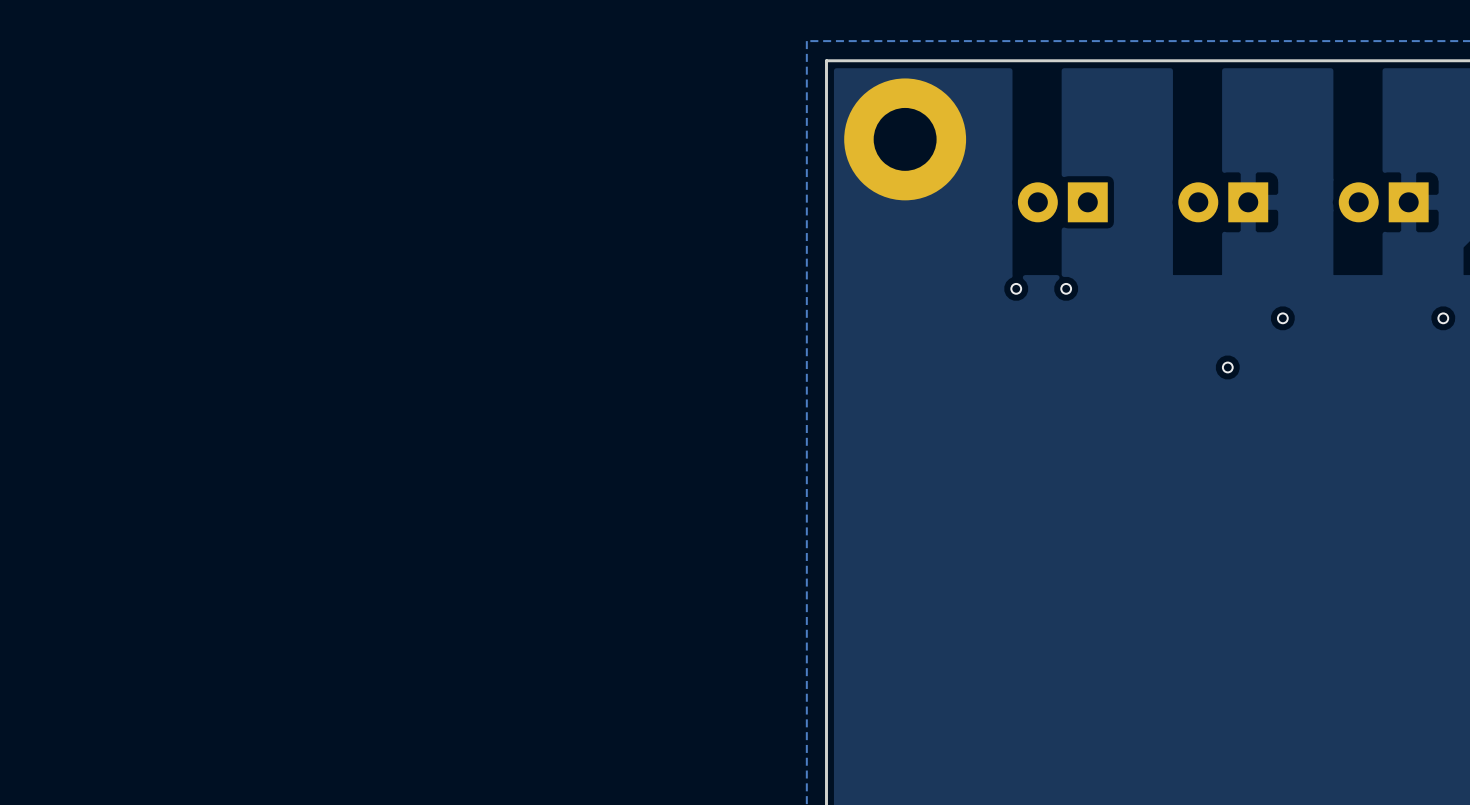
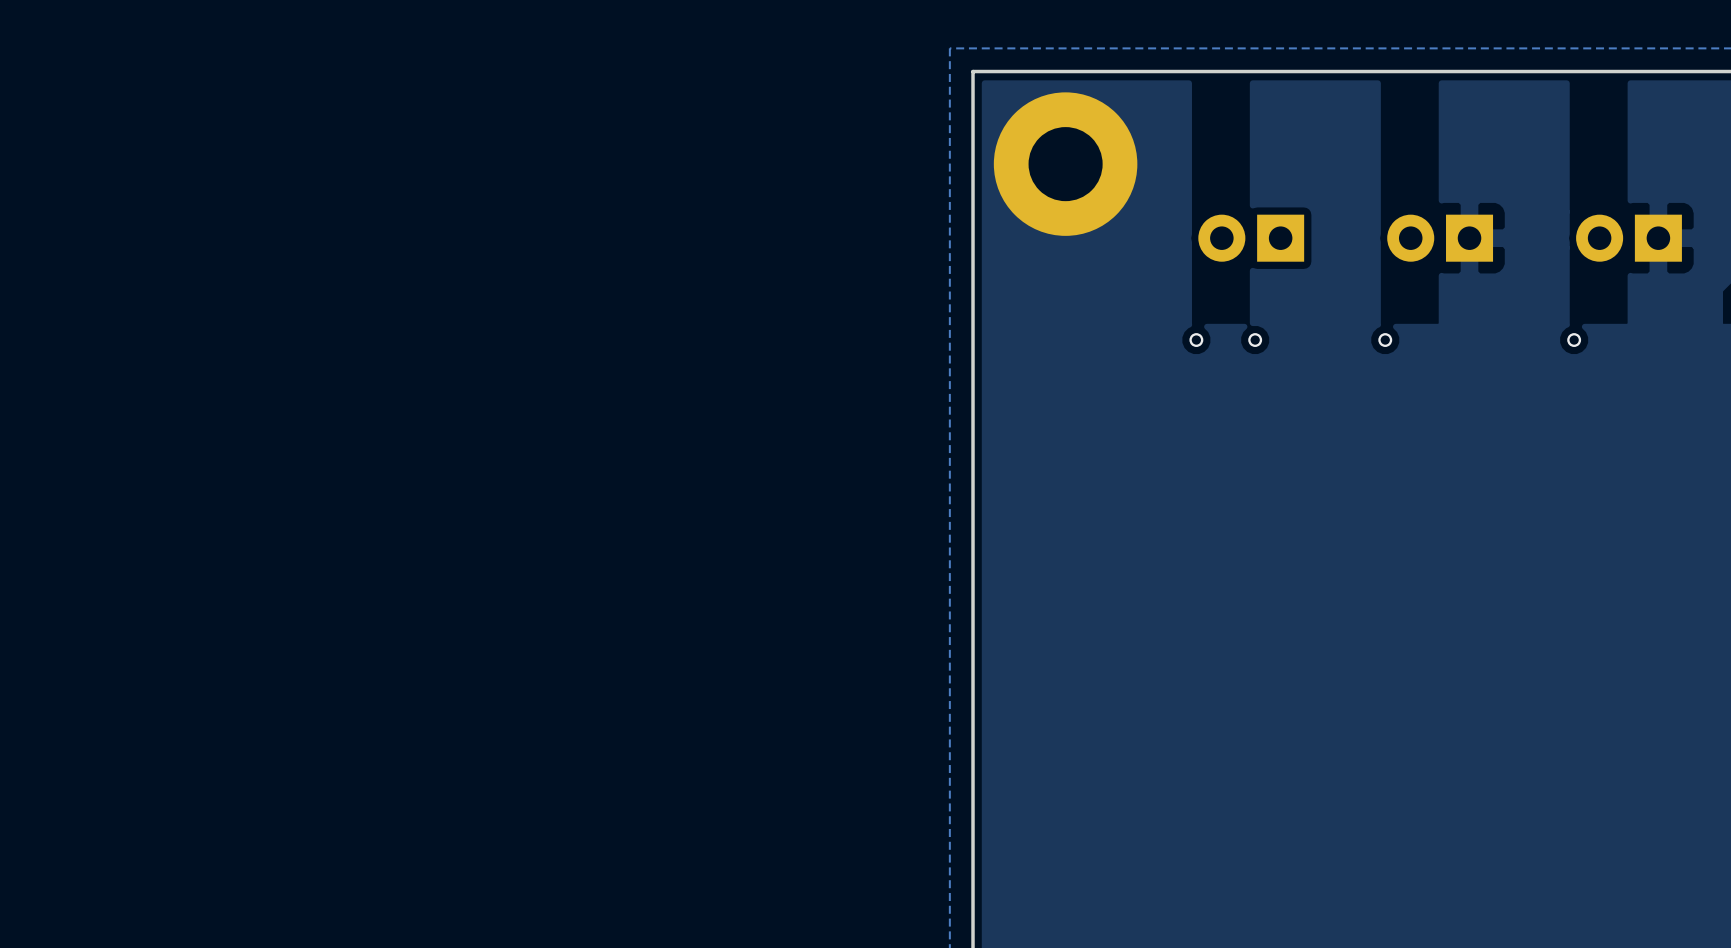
via: none -> (1385, 340)
via: none -> (1574, 340)
via: (1282, 318) -> none
via: (1443, 318) -> none
via: (1227, 367) -> none

